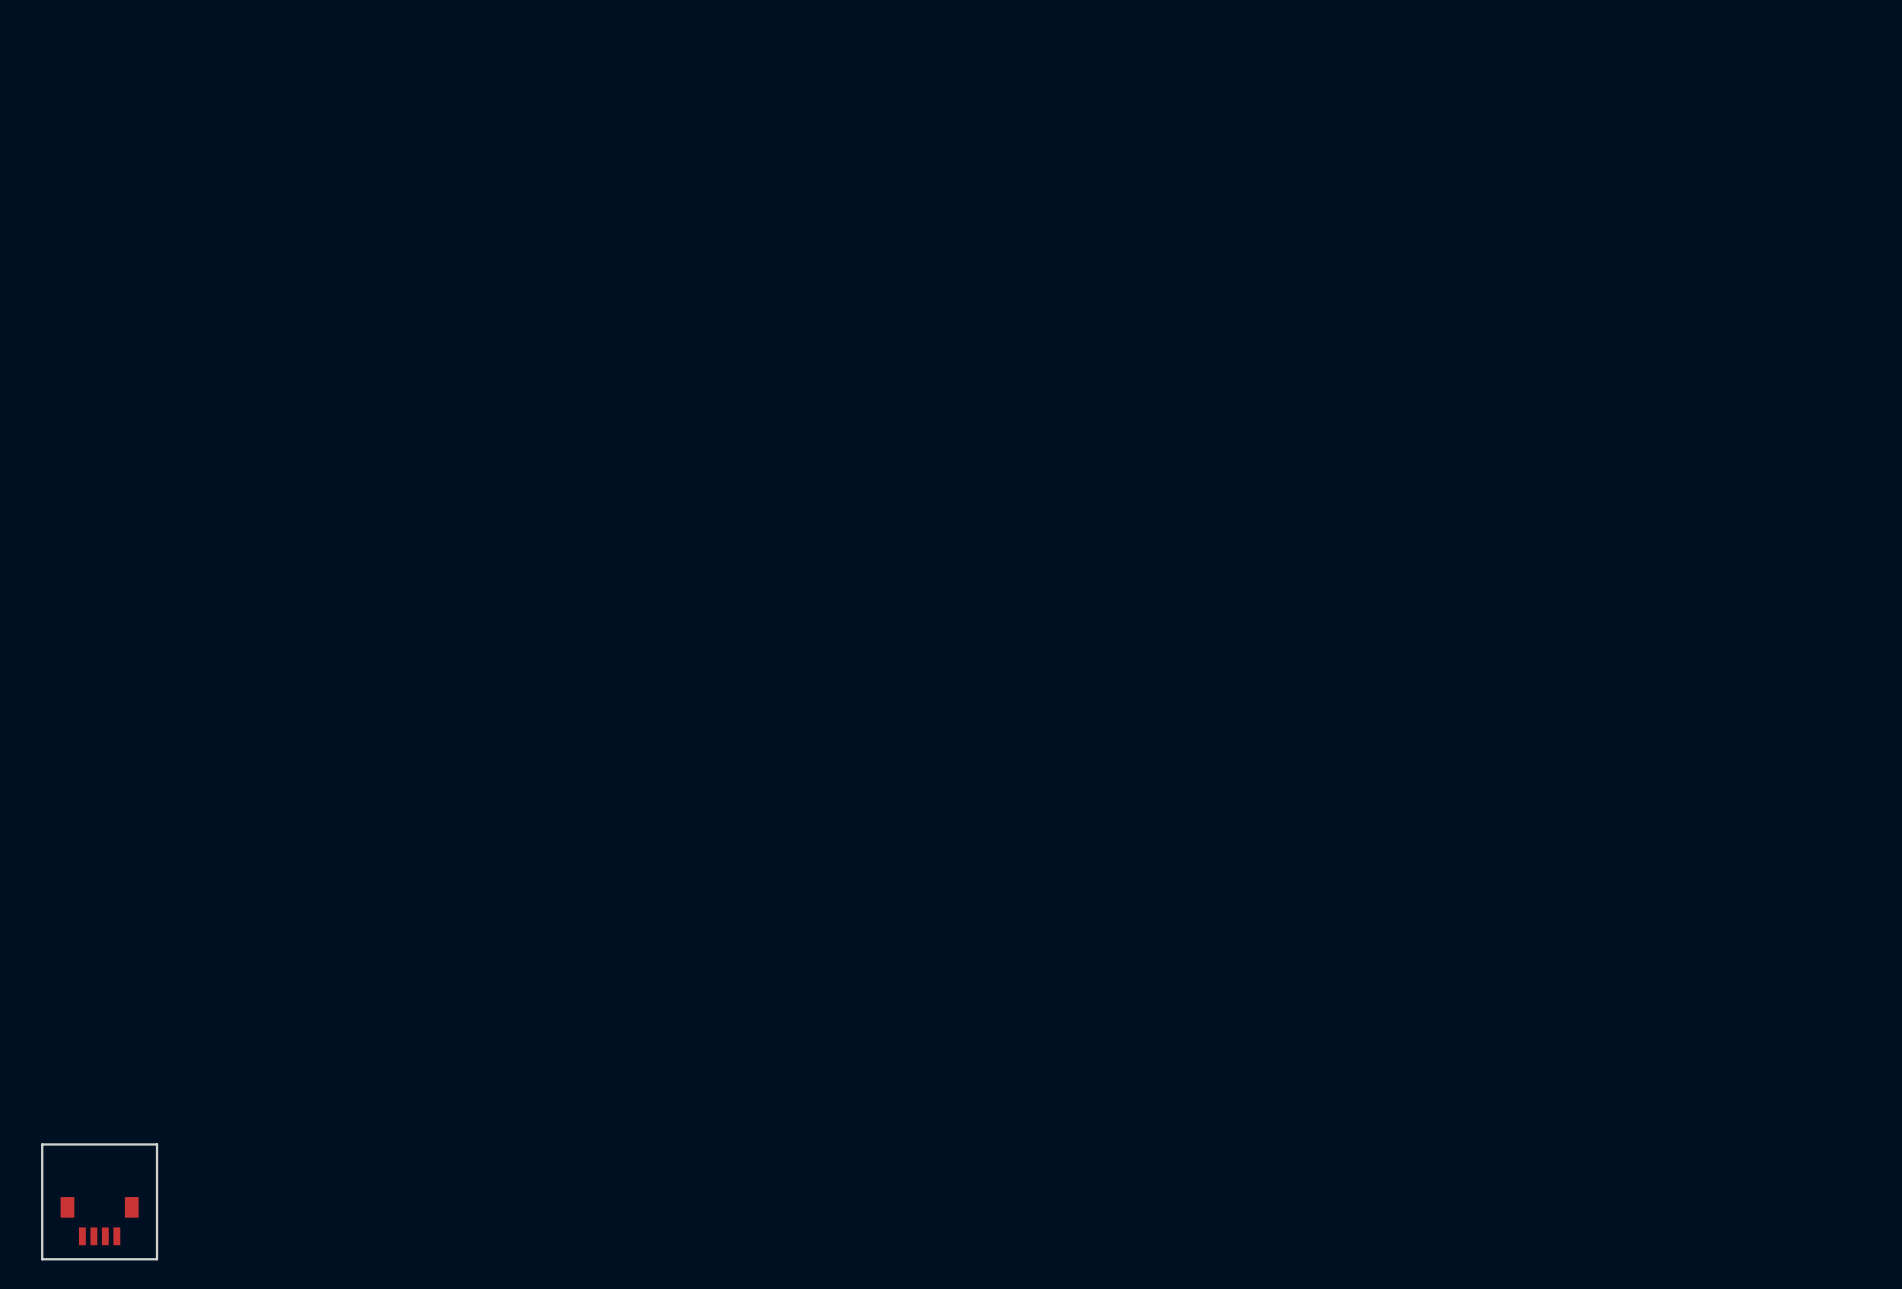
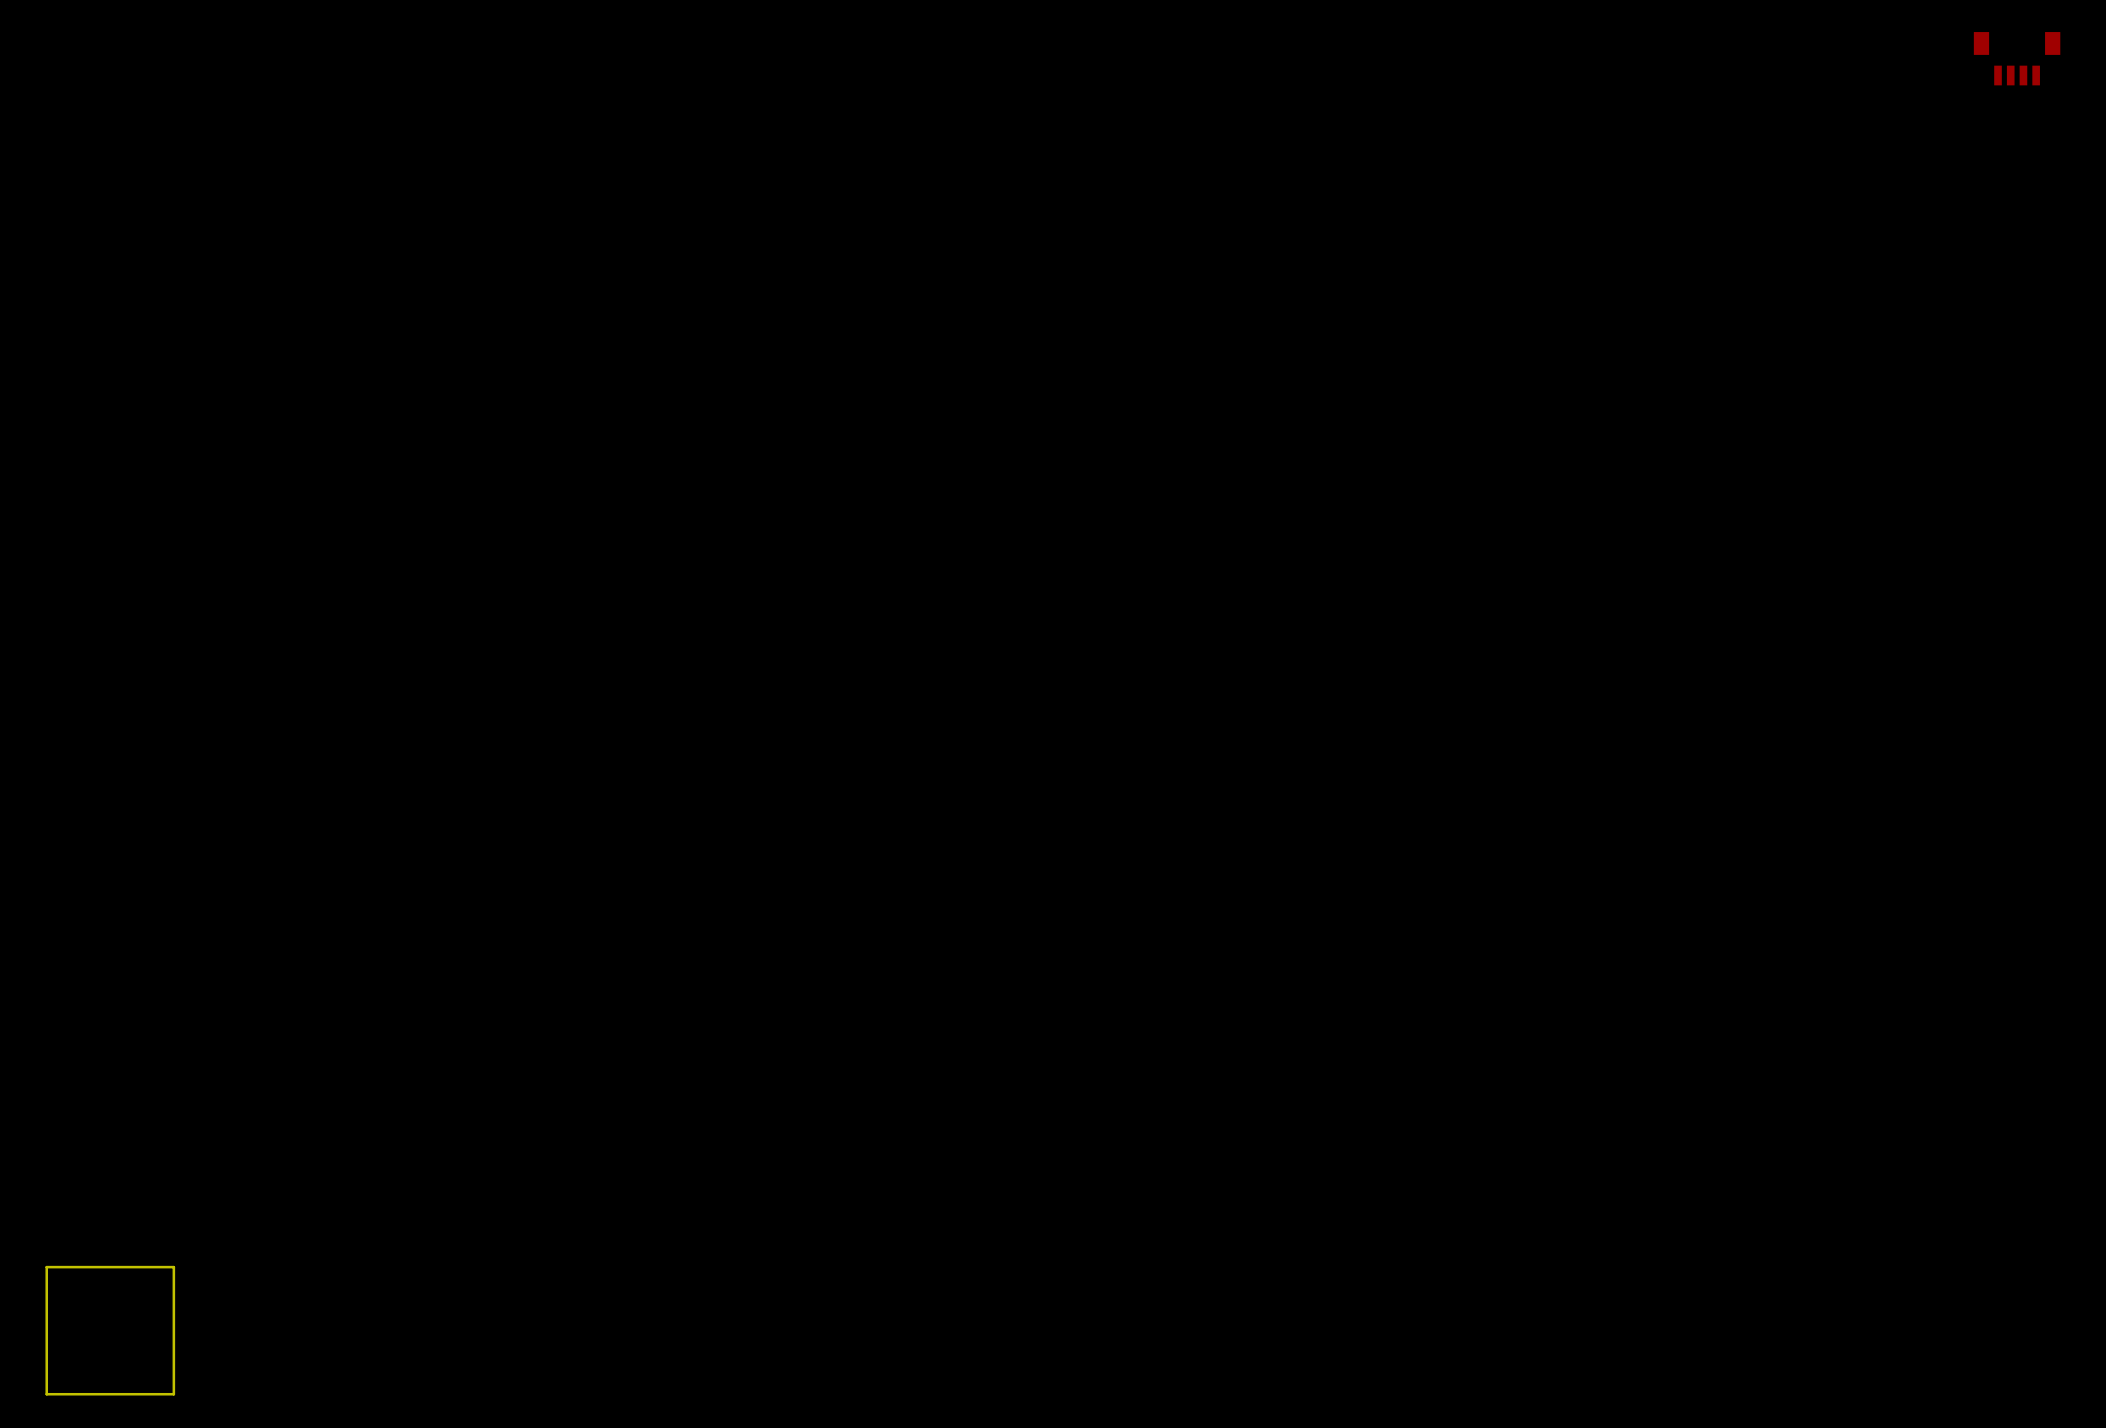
part: none -> (2017, 58)
part: (99, 1221) -> none

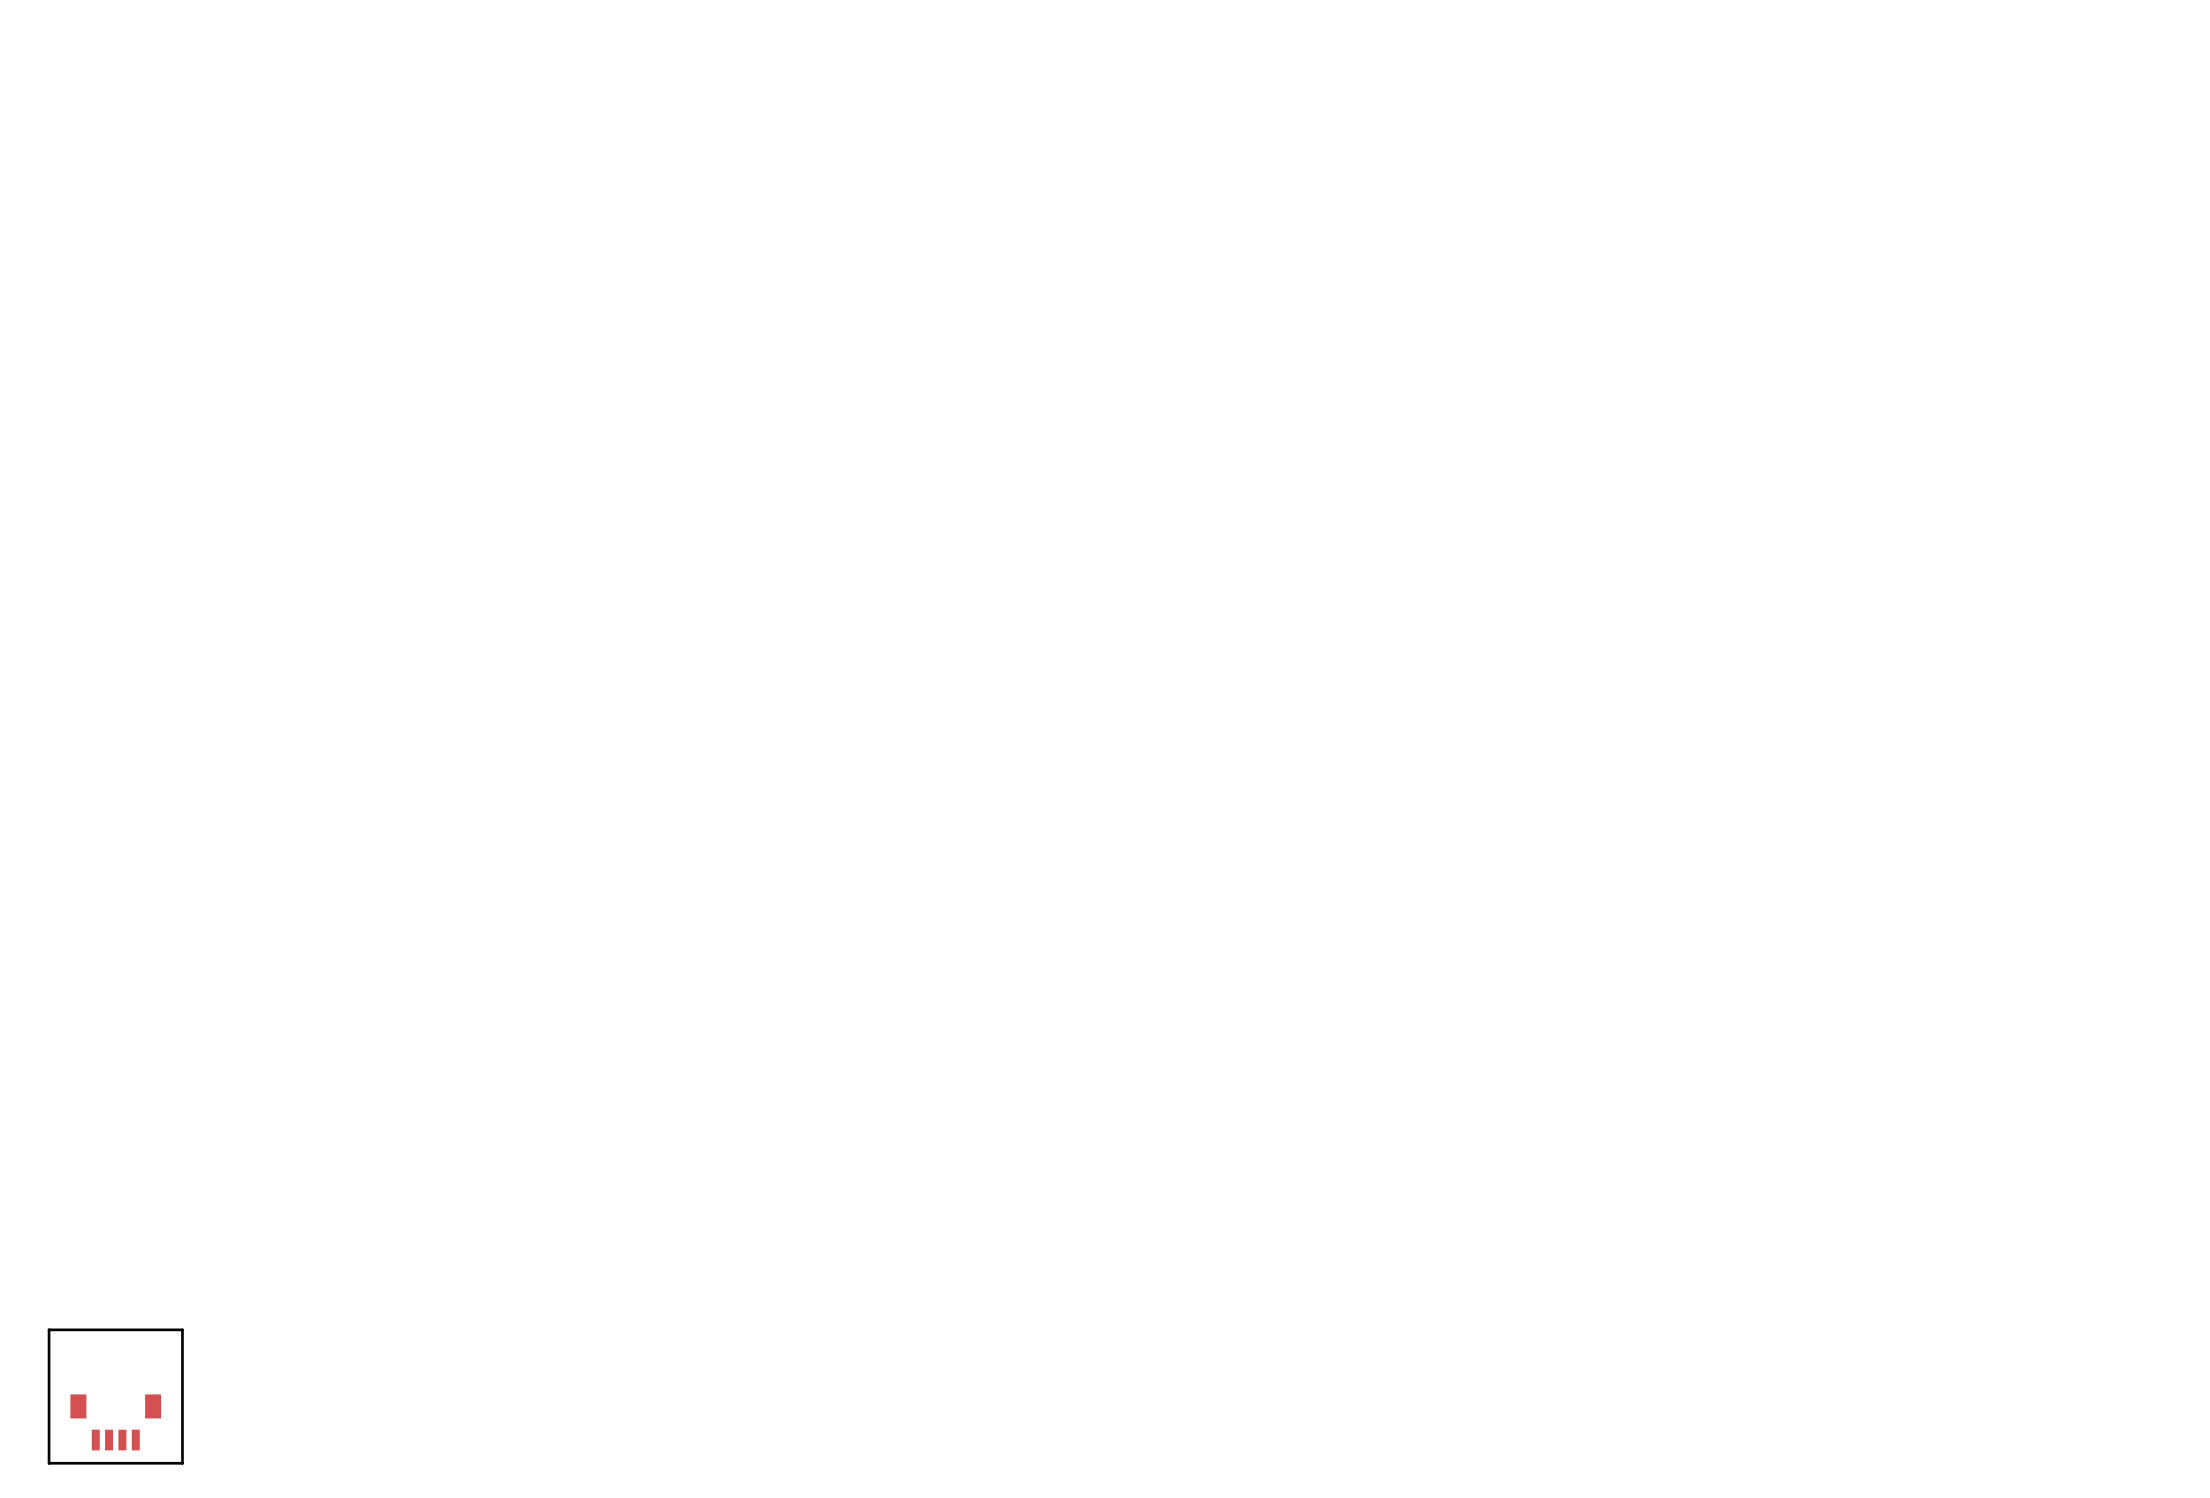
part: (2017, 58) -> none
part: none -> (115, 1422)

